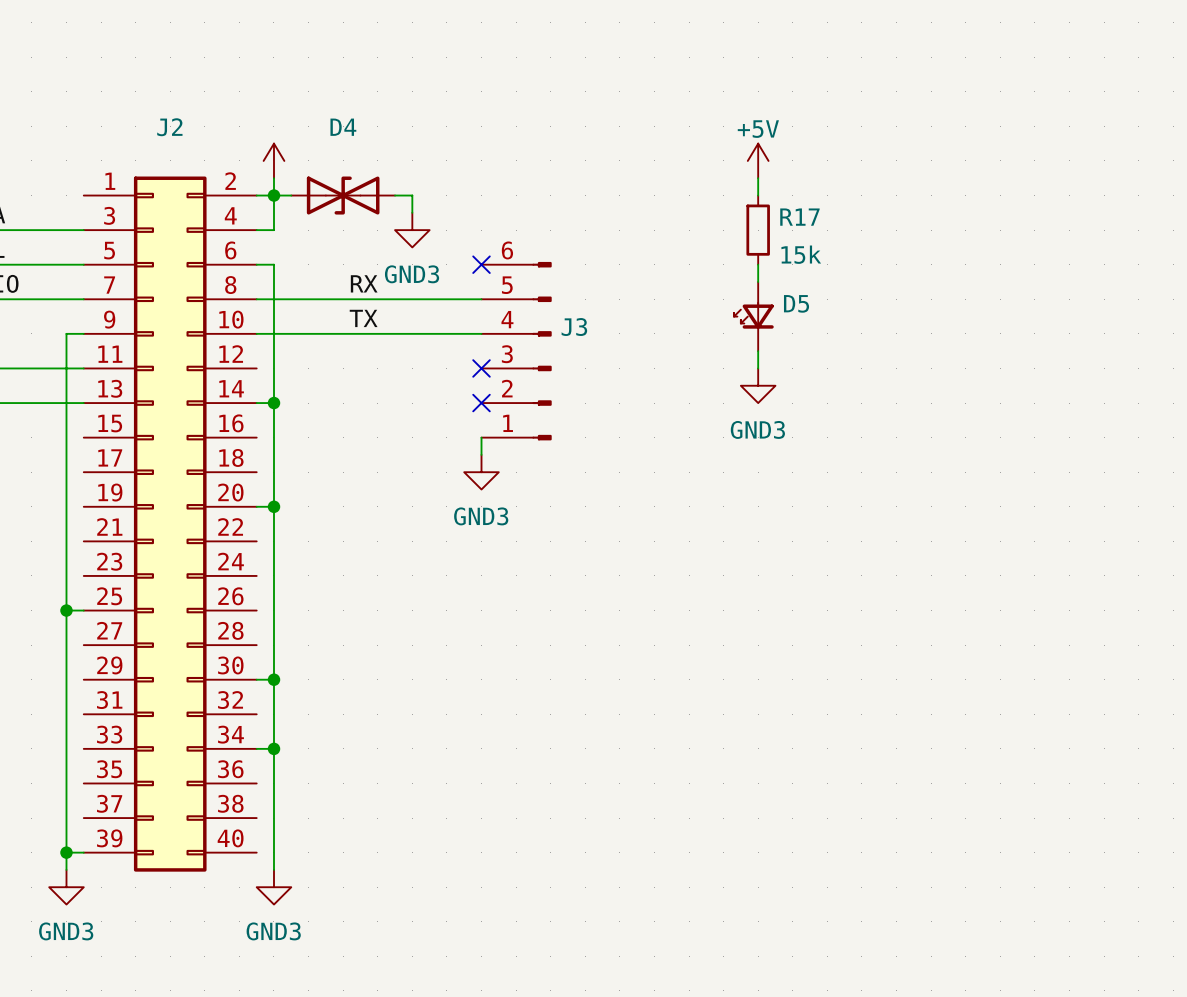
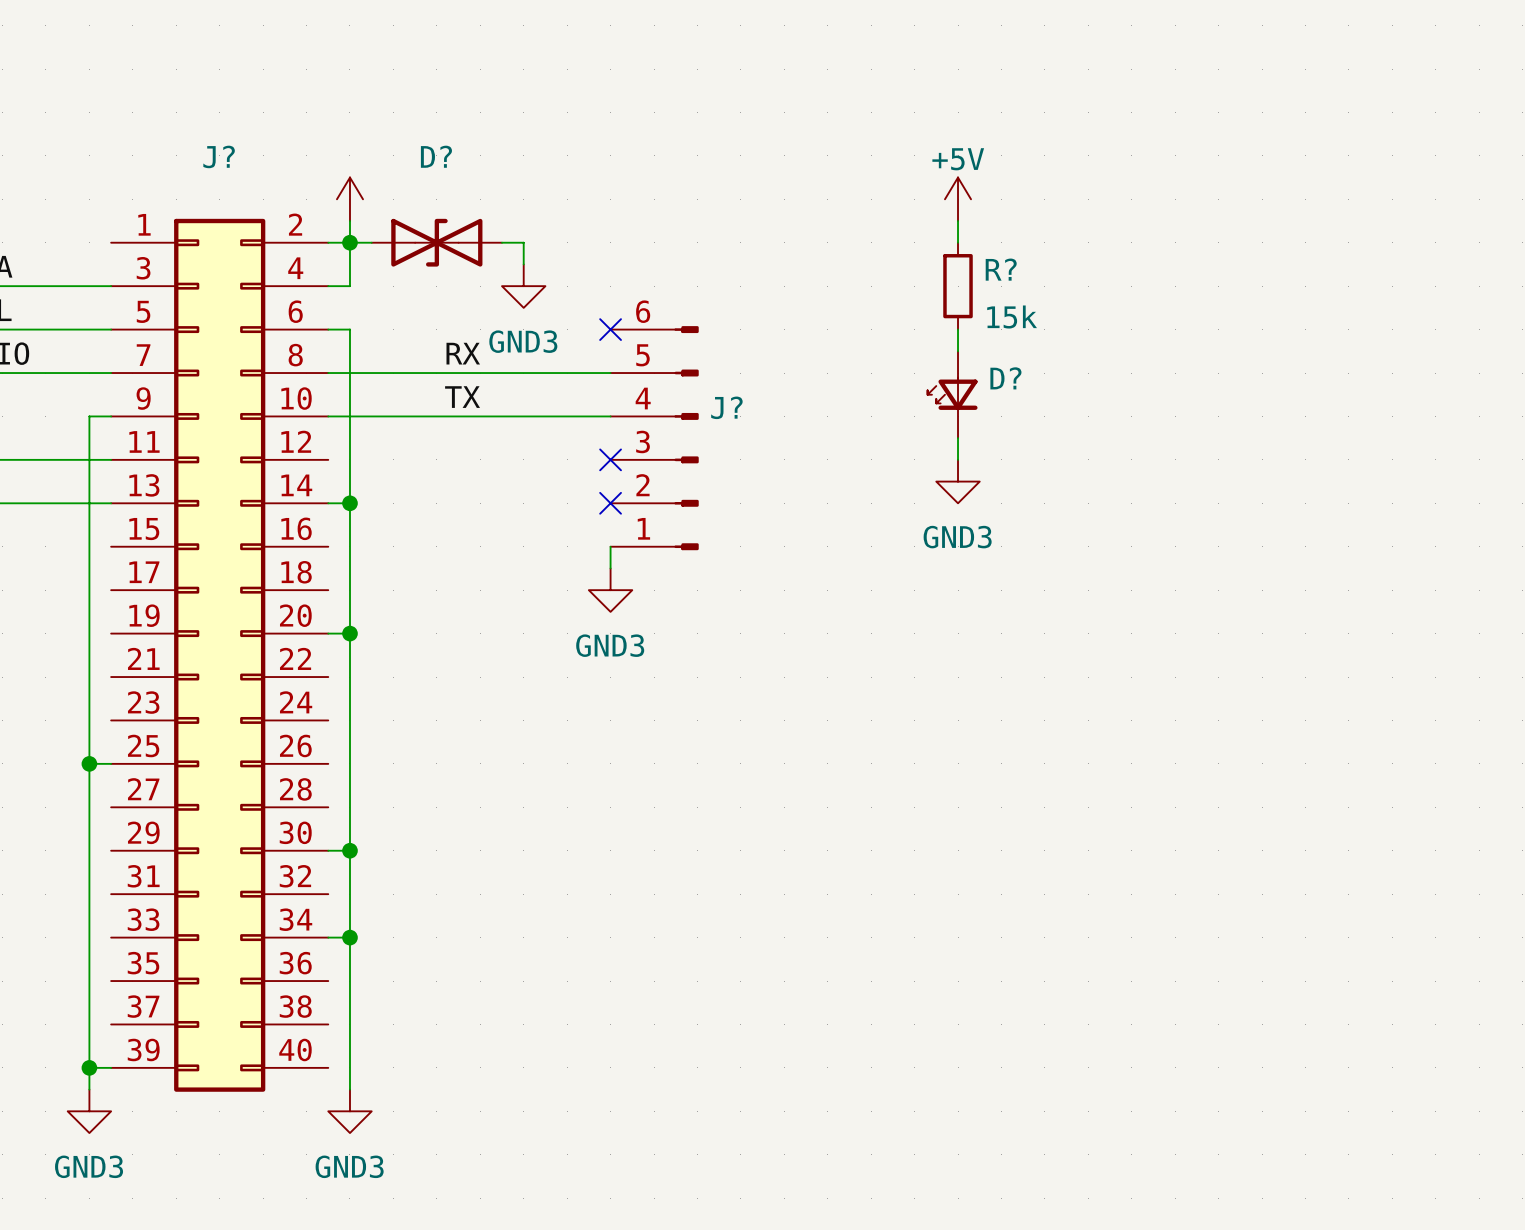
J2 name: J2 (169, 127) -> J? (219, 156)
D4 name: D4 (343, 127) -> D? (436, 156)
R17 name: R17 (799, 217) -> R? (1001, 269)
D5 name: D5 (796, 303) -> D? (1005, 378)
J3 name: J3 (574, 327) -> J? (726, 407)

